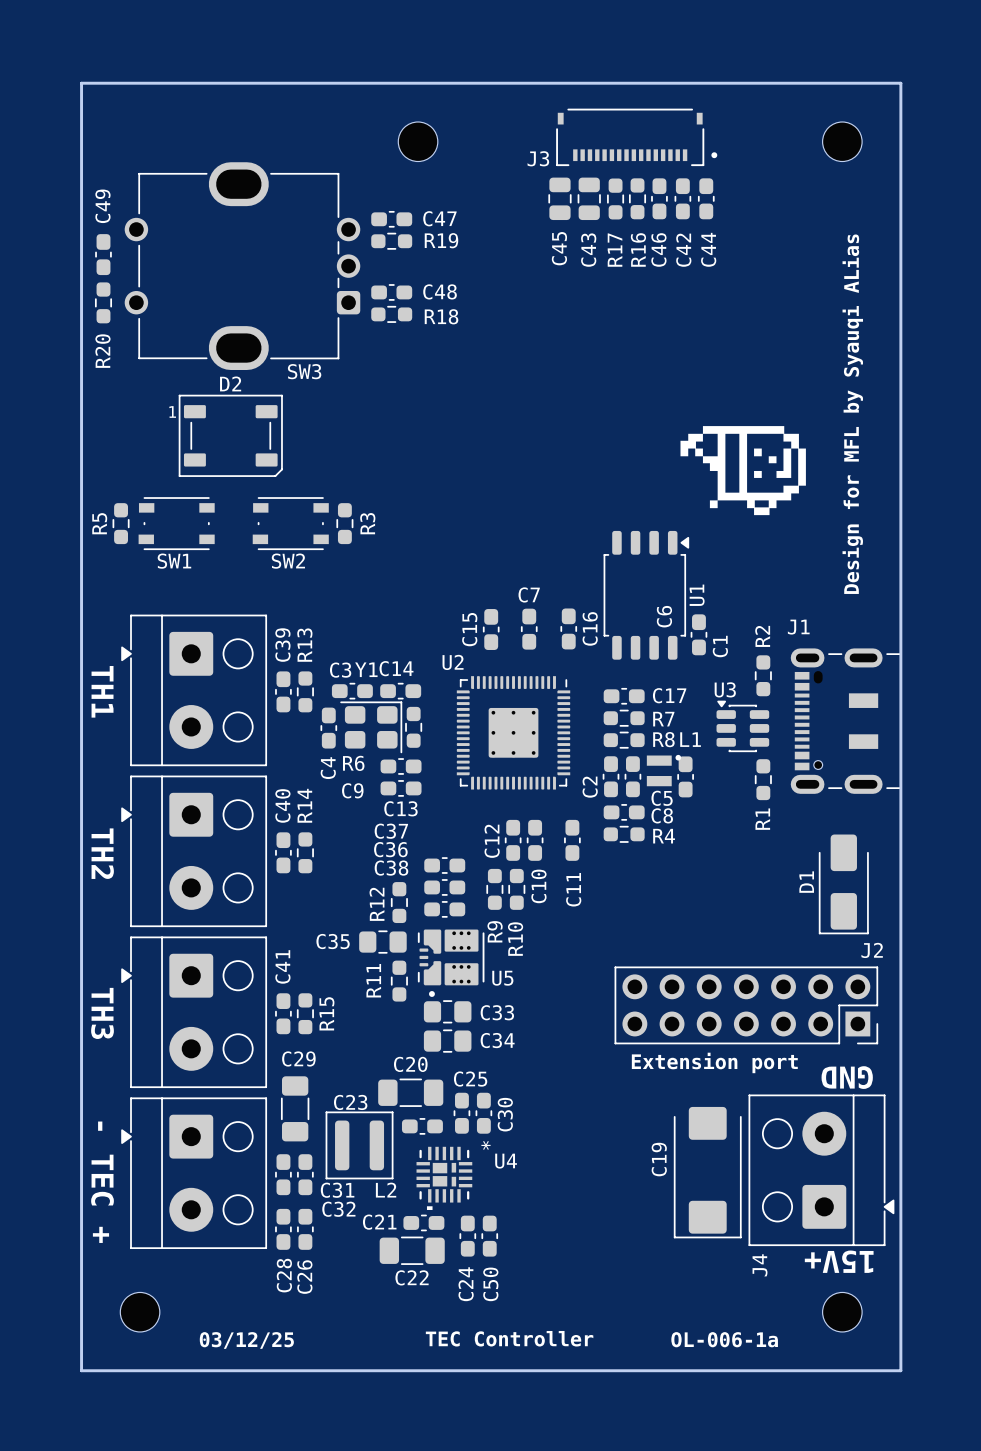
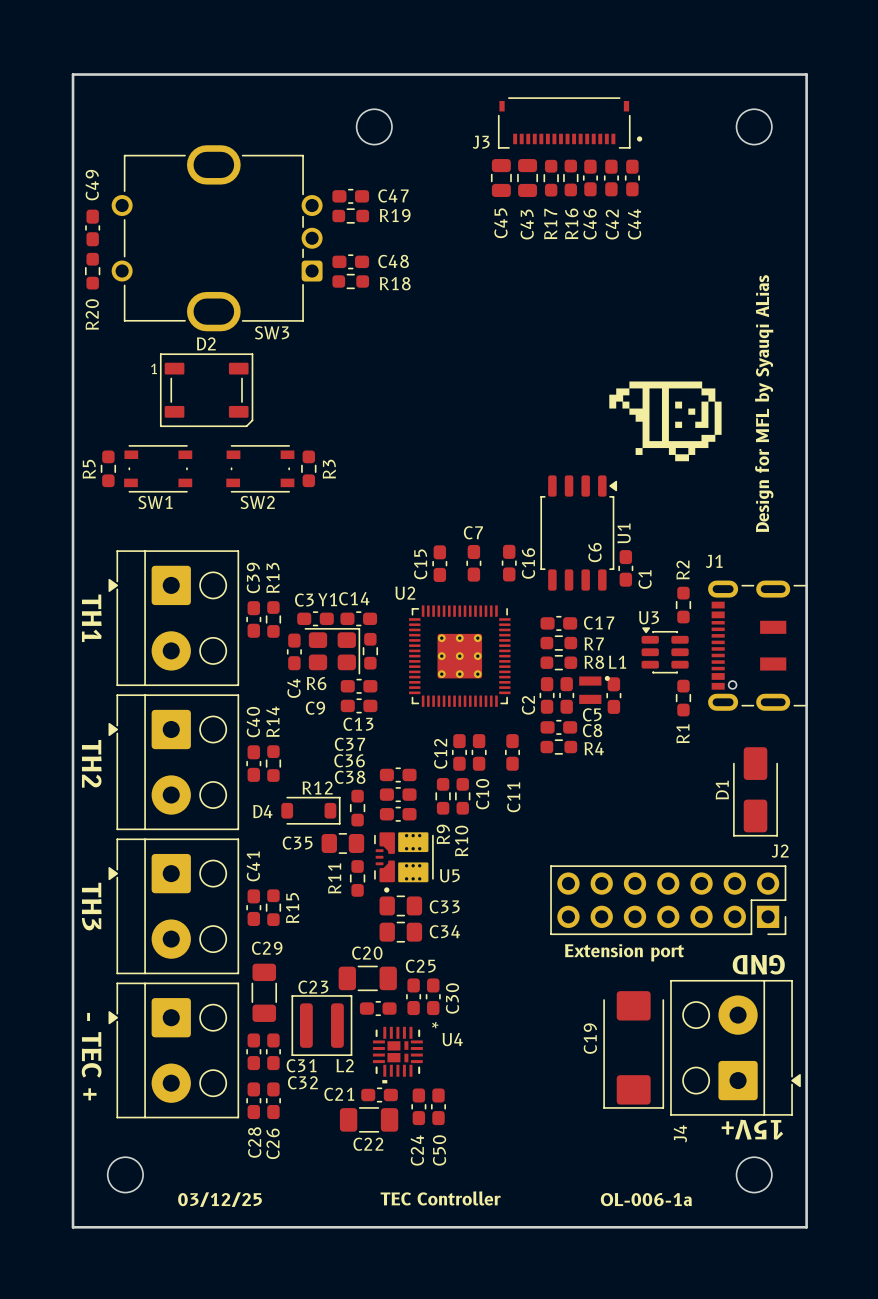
R12 name rotation: 0° (376, 904) -> 90° clockwise (317, 787)
D4: none -> (310, 810)

